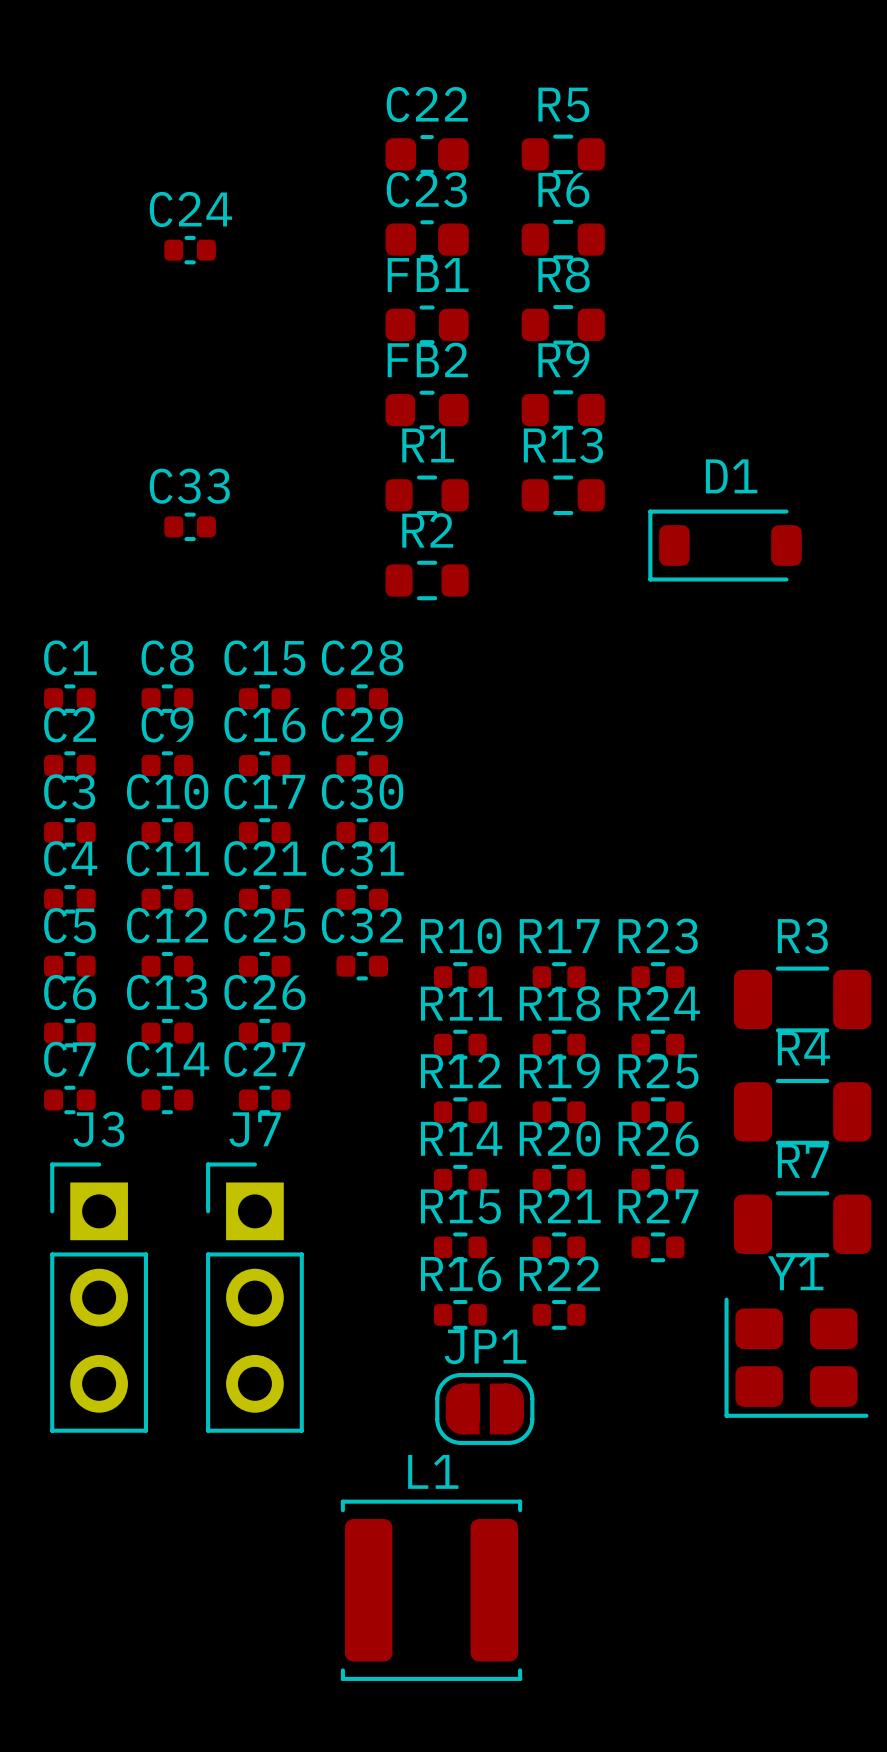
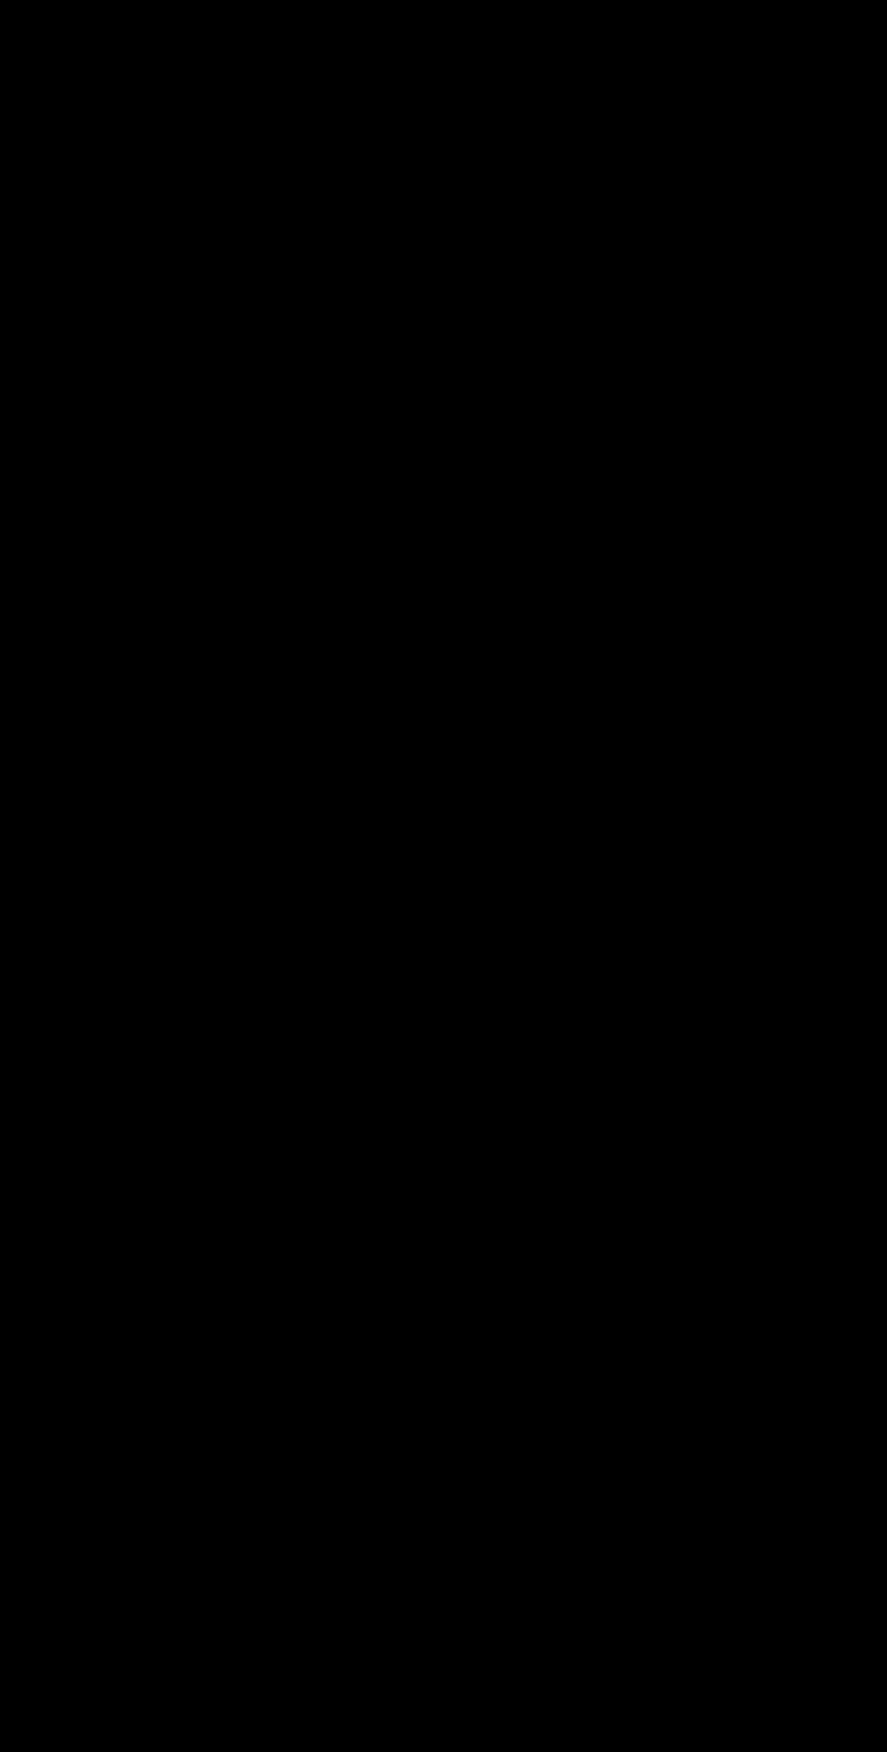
C22: (427, 154) -> none
R5: (563, 154) -> none
C23: (427, 239) -> none
R6: (563, 239) -> none
C24: (190, 250) -> none
FB1: (427, 324) -> none
R8: (563, 324) -> none
FB2: (427, 410) -> none
R9: (563, 410) -> none
R1: (427, 495) -> none
R13: (563, 495) -> none
C33: (190, 526) -> none
D1: (725, 545) -> none
R2: (427, 580) -> none
C1: (69, 698) -> none
C8: (167, 698) -> none
C15: (264, 698) -> none
C28: (362, 698) -> none
C2: (69, 765) -> none
C9: (167, 765) -> none
C16: (264, 765) -> none
C29: (362, 765) -> none
C3: (69, 832) -> none
C10: (167, 832) -> none
C17: (264, 832) -> none
C30: (362, 832) -> none
C4: (69, 899) -> none
C11: (167, 899) -> none
C21: (264, 899) -> none
C31: (362, 899) -> none
C5: (69, 966) -> none
C12: (167, 966) -> none
C25: (264, 966) -> none
C32: (362, 966) -> none
R10: (460, 977) -> none
R17: (559, 977) -> none
R23: (657, 977) -> none
R3: (802, 999) -> none
C6: (69, 1033) -> none
C13: (167, 1033) -> none
C26: (264, 1033) -> none
R11: (460, 1044) -> none
R18: (559, 1044) -> none
R24: (657, 1044) -> none
C7: (69, 1099) -> none
C14: (167, 1099) -> none
C27: (264, 1099) -> none
R4: (802, 1111) -> none
R12: (460, 1112) -> none
R19: (559, 1112) -> none
R25: (657, 1112) -> none
R14: (460, 1179) -> none
R20: (559, 1179) -> none
R26: (657, 1179) -> none
R7: (802, 1224) -> none
R15: (460, 1247) -> none
R21: (559, 1247) -> none
R27: (657, 1247) -> none
J3: (99, 1297) -> none
J7: (254, 1297) -> none
R16: (460, 1314) -> none
R22: (559, 1314) -> none
Y1: (796, 1357) -> none
JP1: (484, 1408) -> none
L1: (431, 1590) -> none

